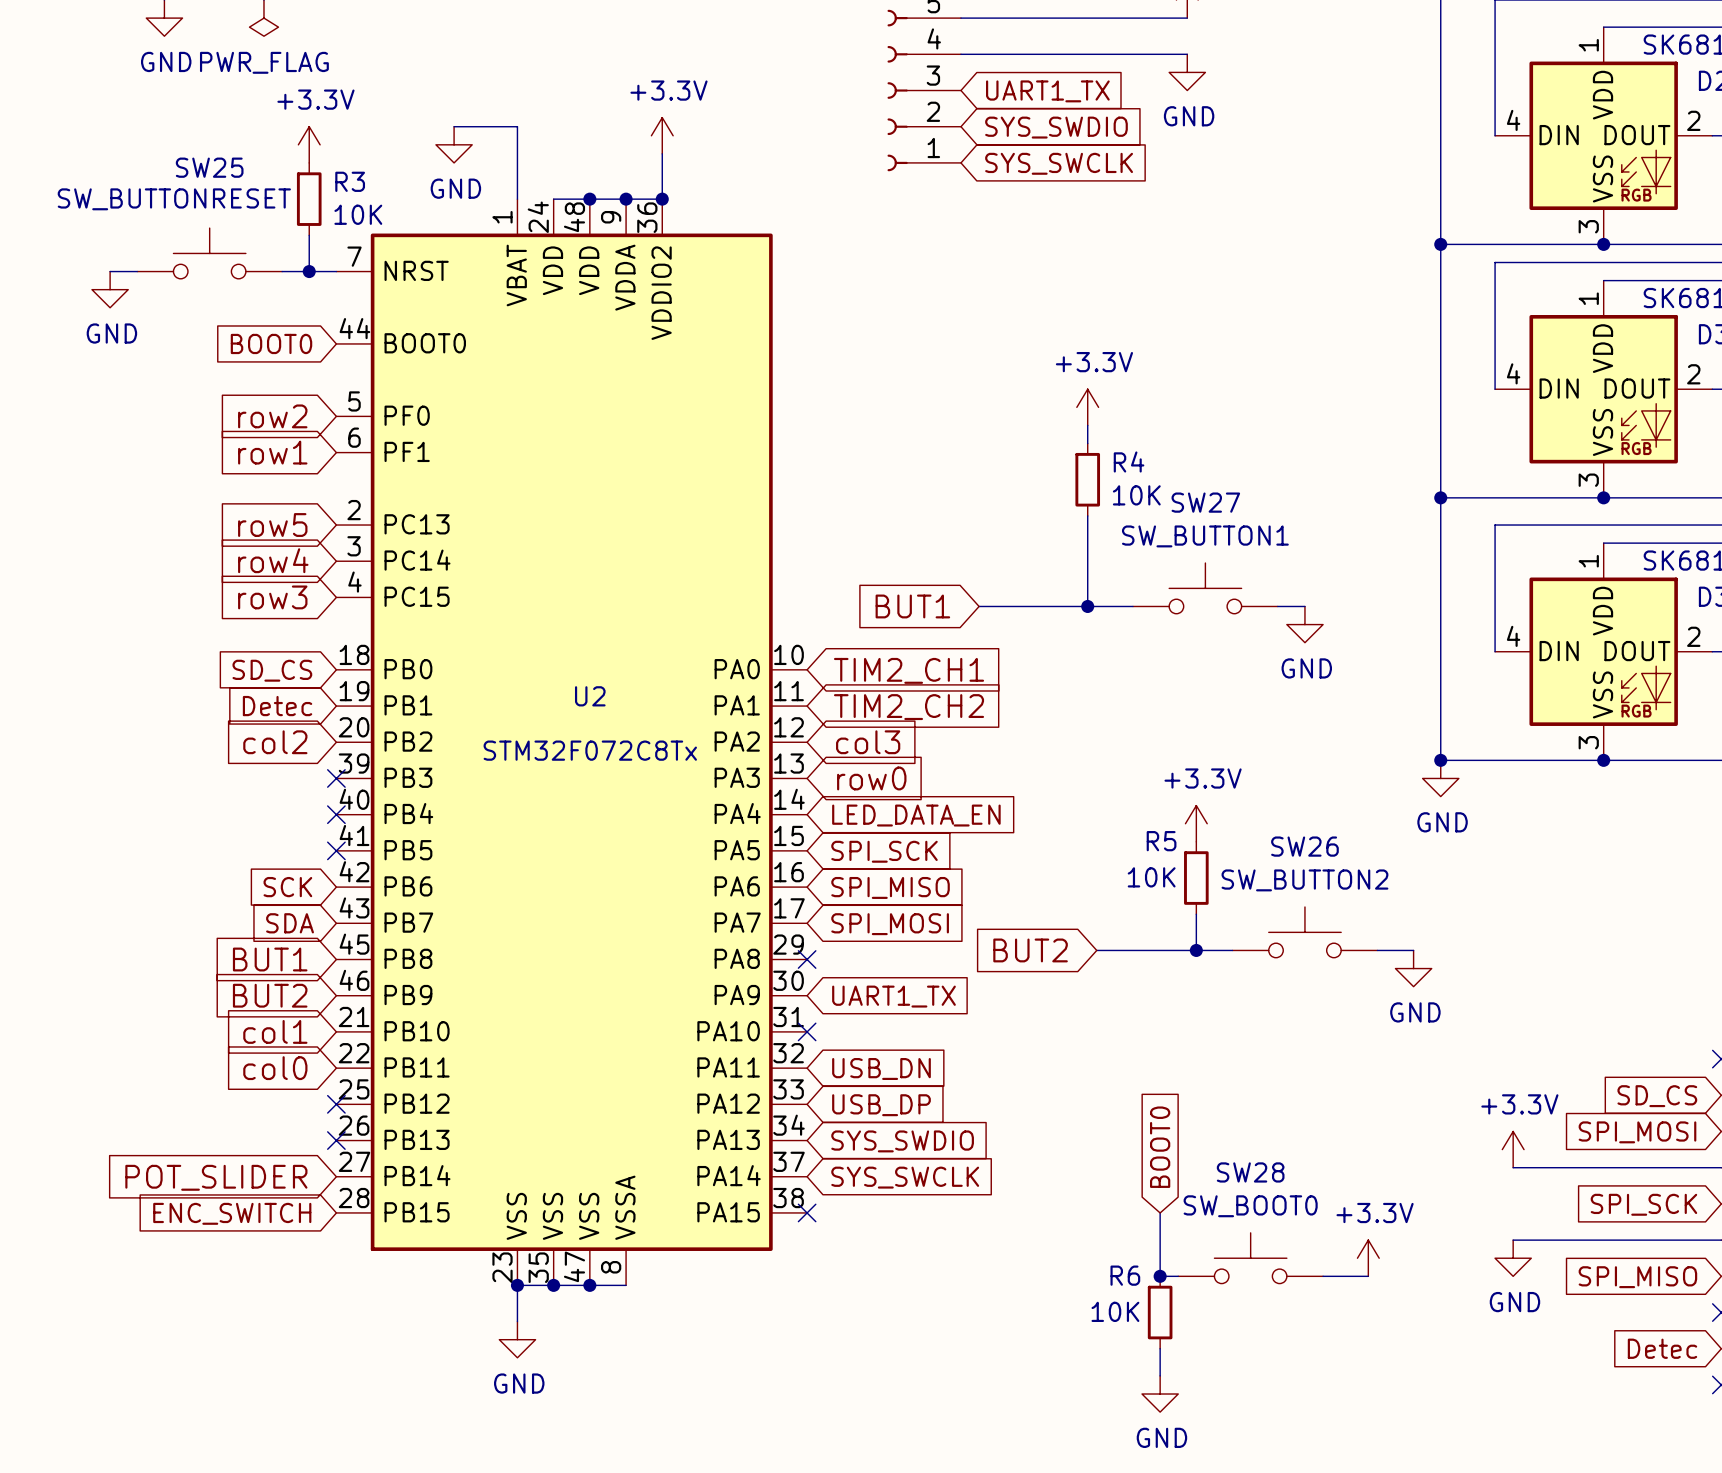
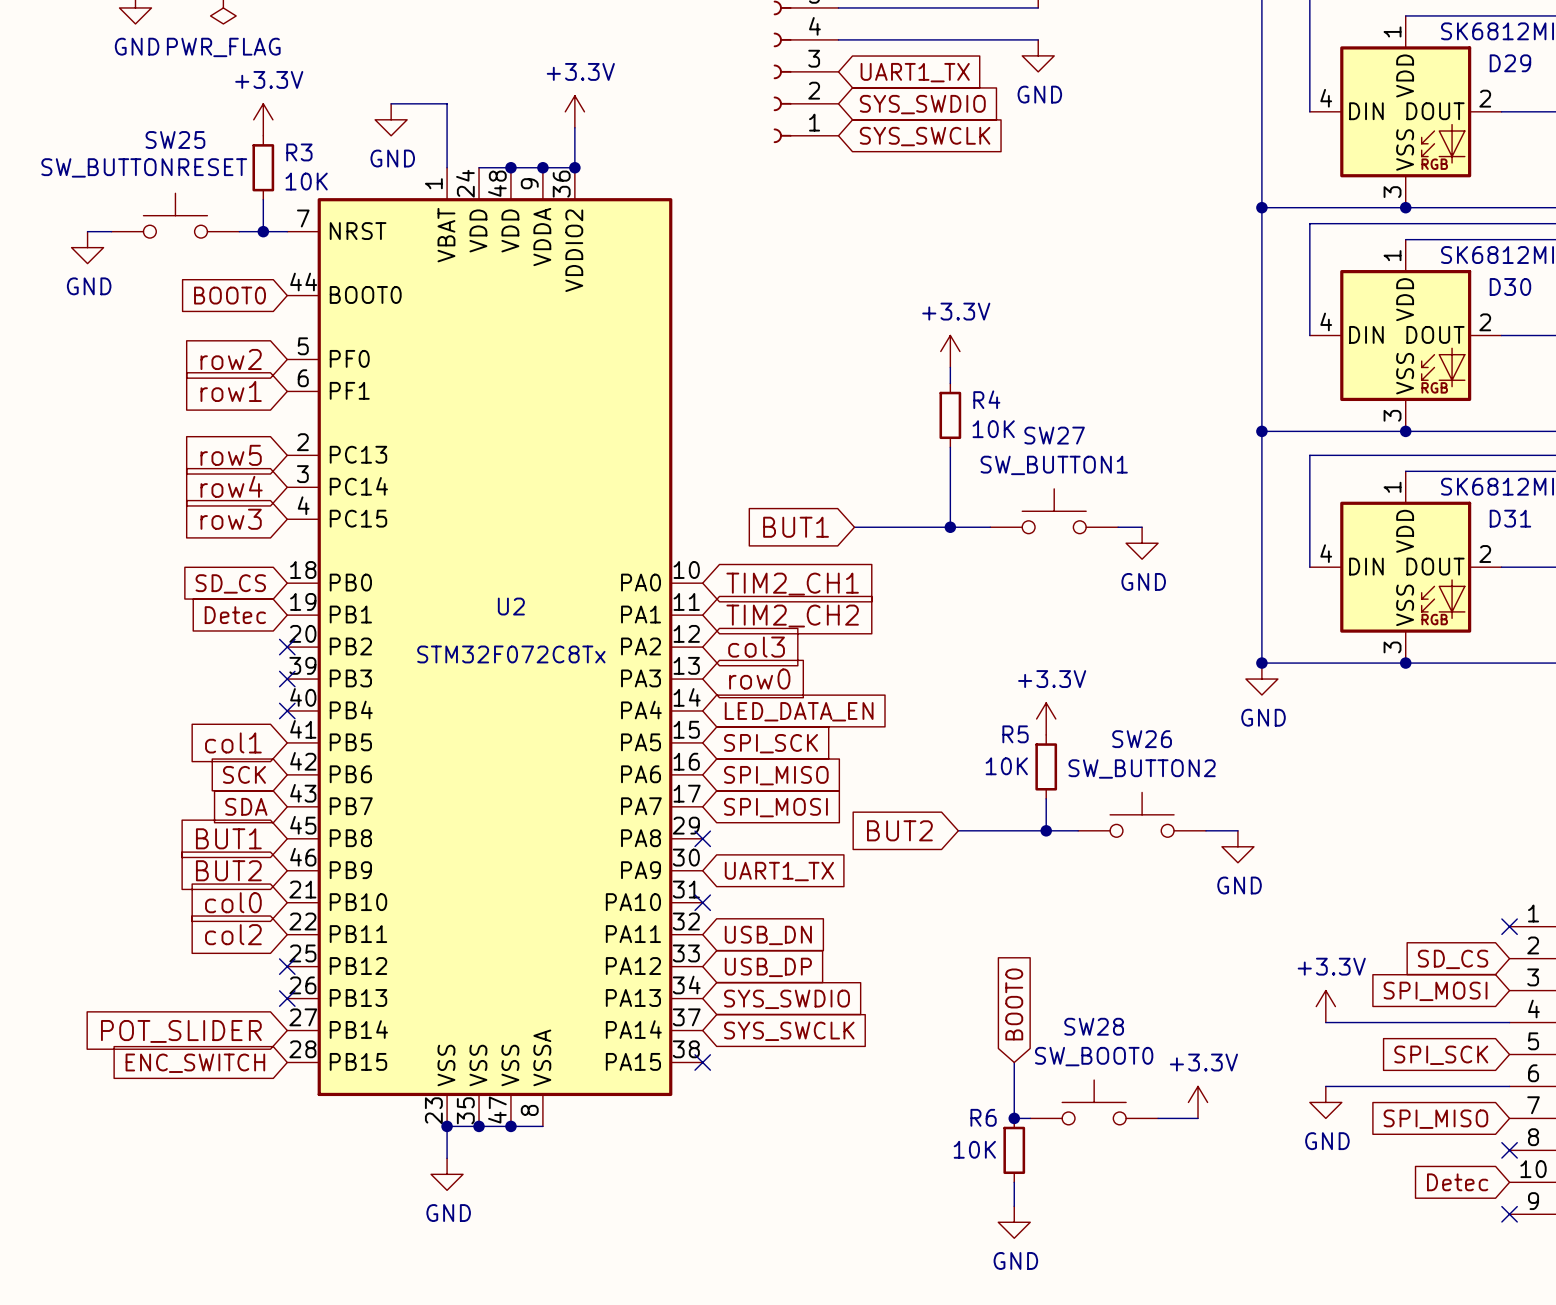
global label: col2 (275, 742) -> none
no-connect mark: none -> (287, 647)
global label: none -> col1 (233, 742)
no-connect mark: (336, 850) -> none
global label: col1 (275, 1031) -> col0 (233, 902)
global label: col0 (275, 1068) -> col2 (233, 934)

